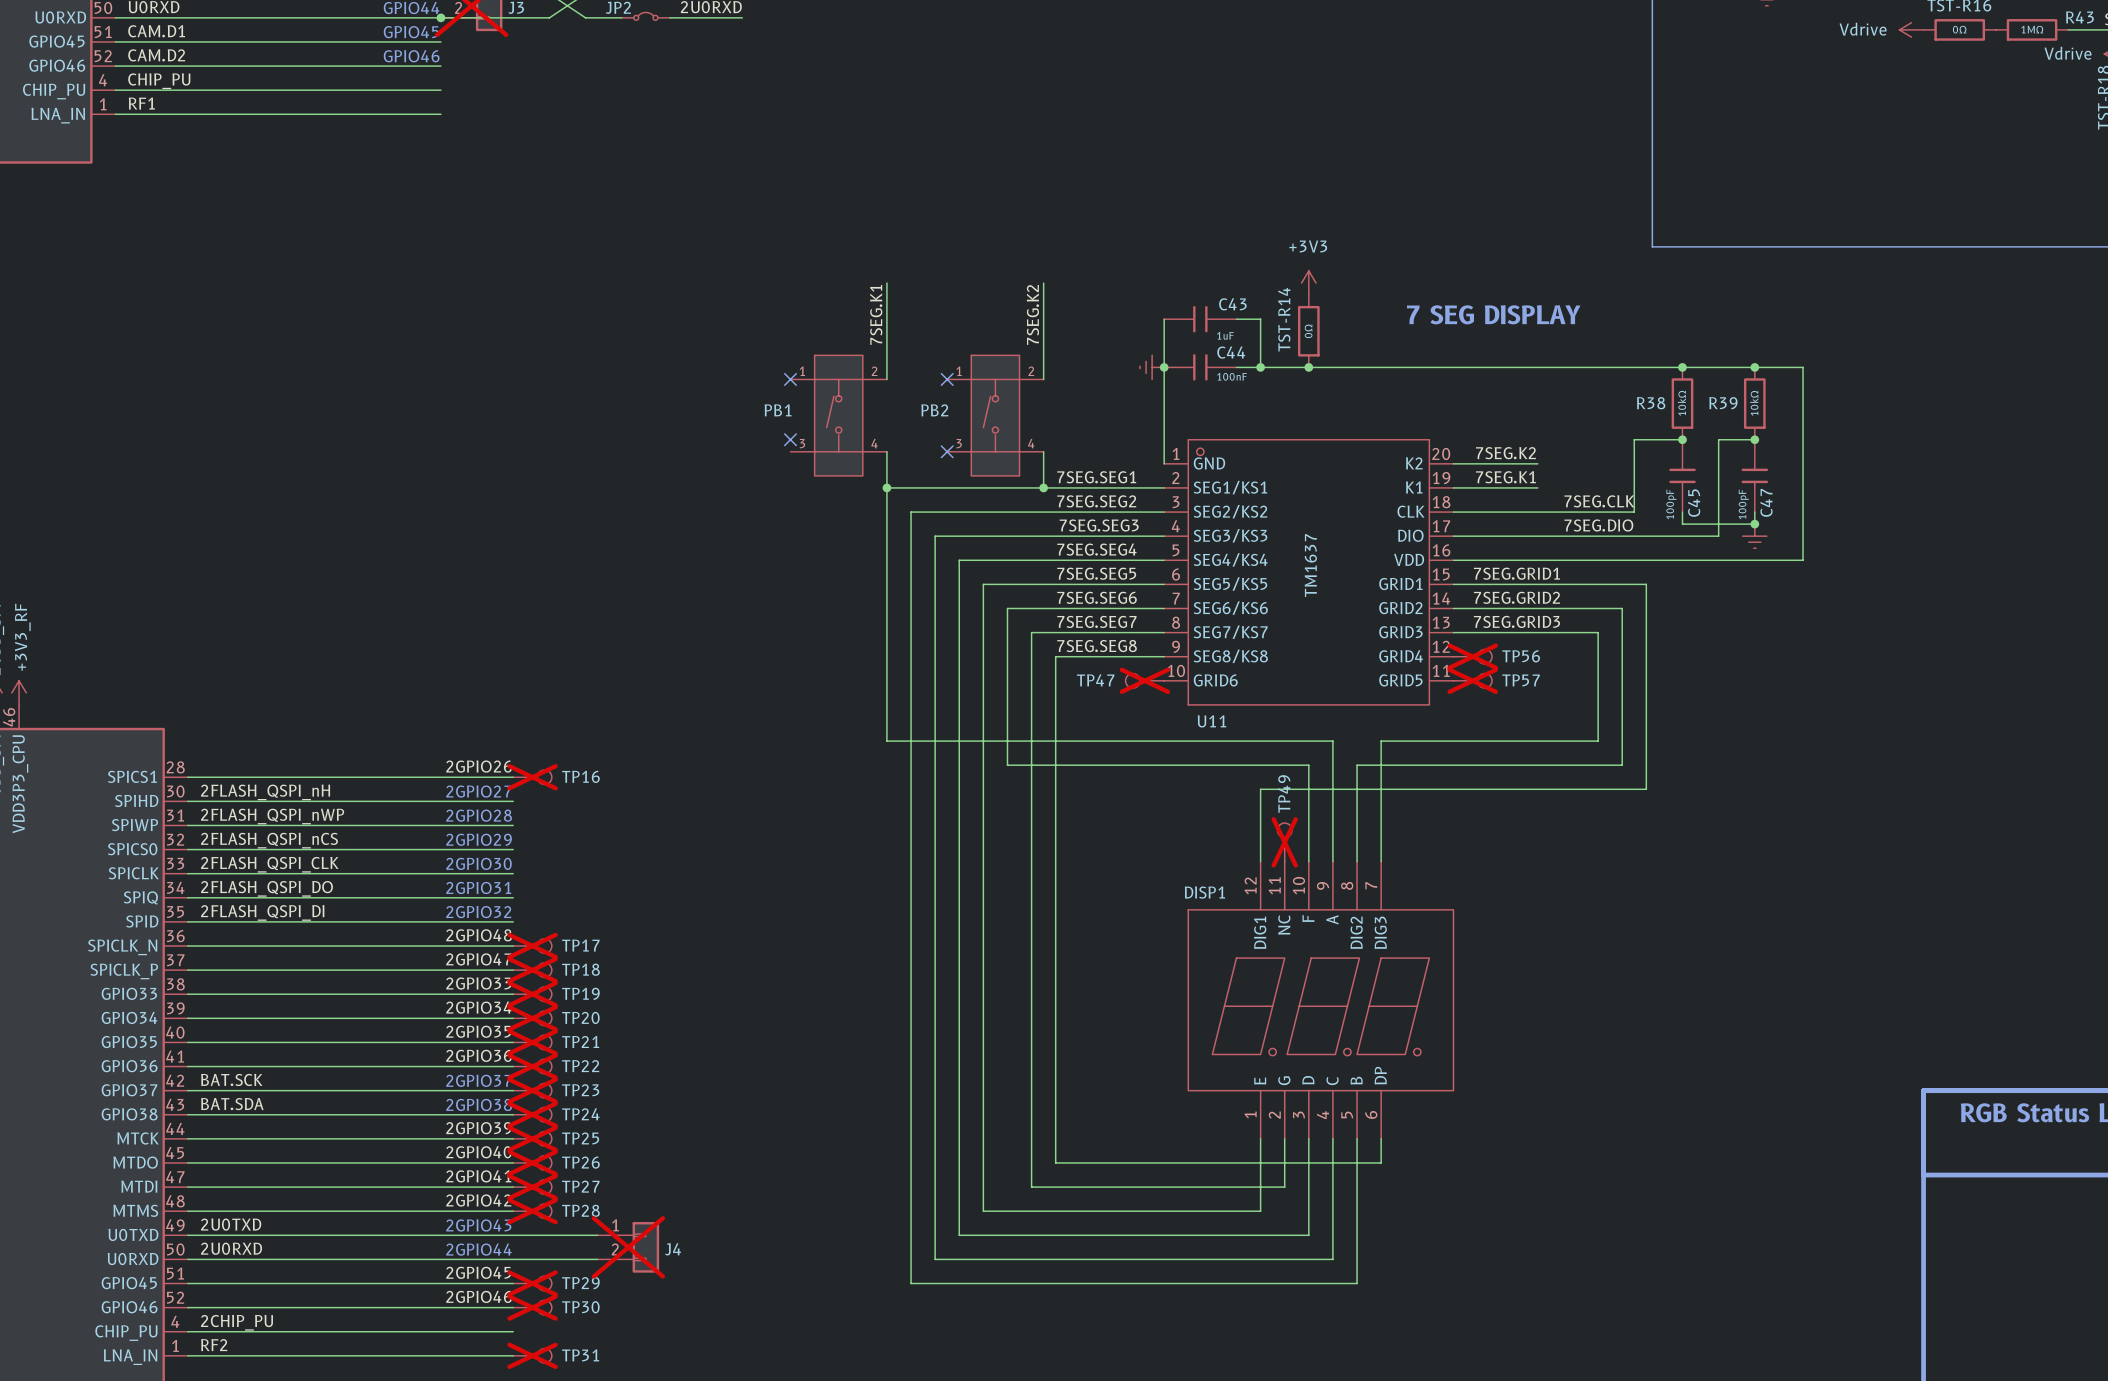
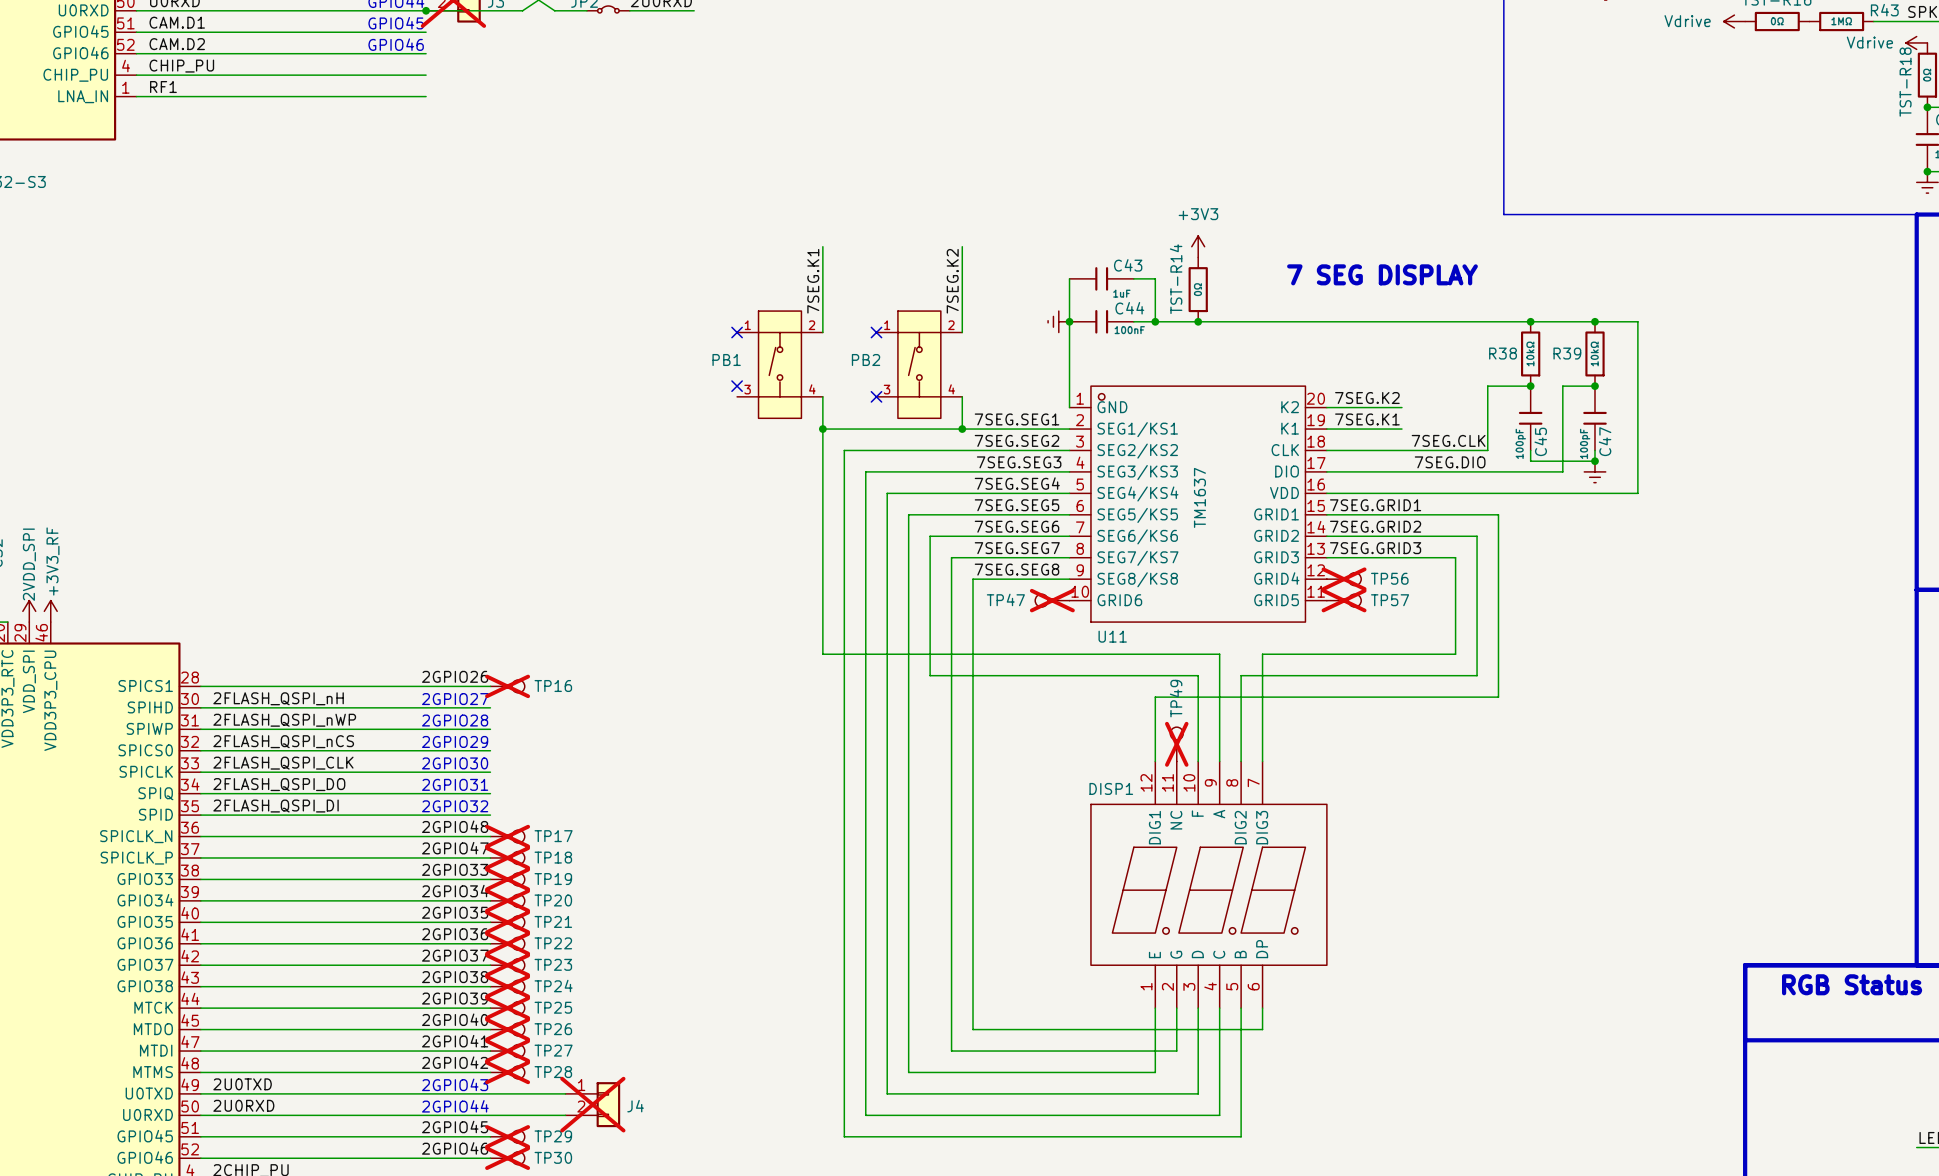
label: BAT.SCK (231, 1079) -> none
label: none -> 2GPIO37 (455, 955)
text: 2GPIO37 (478, 1080) -> none
label: BAT.SDA (232, 1104) -> none
text: 2GPIO38 (479, 1104) -> none
label: none -> 2GPIO38 (455, 977)

